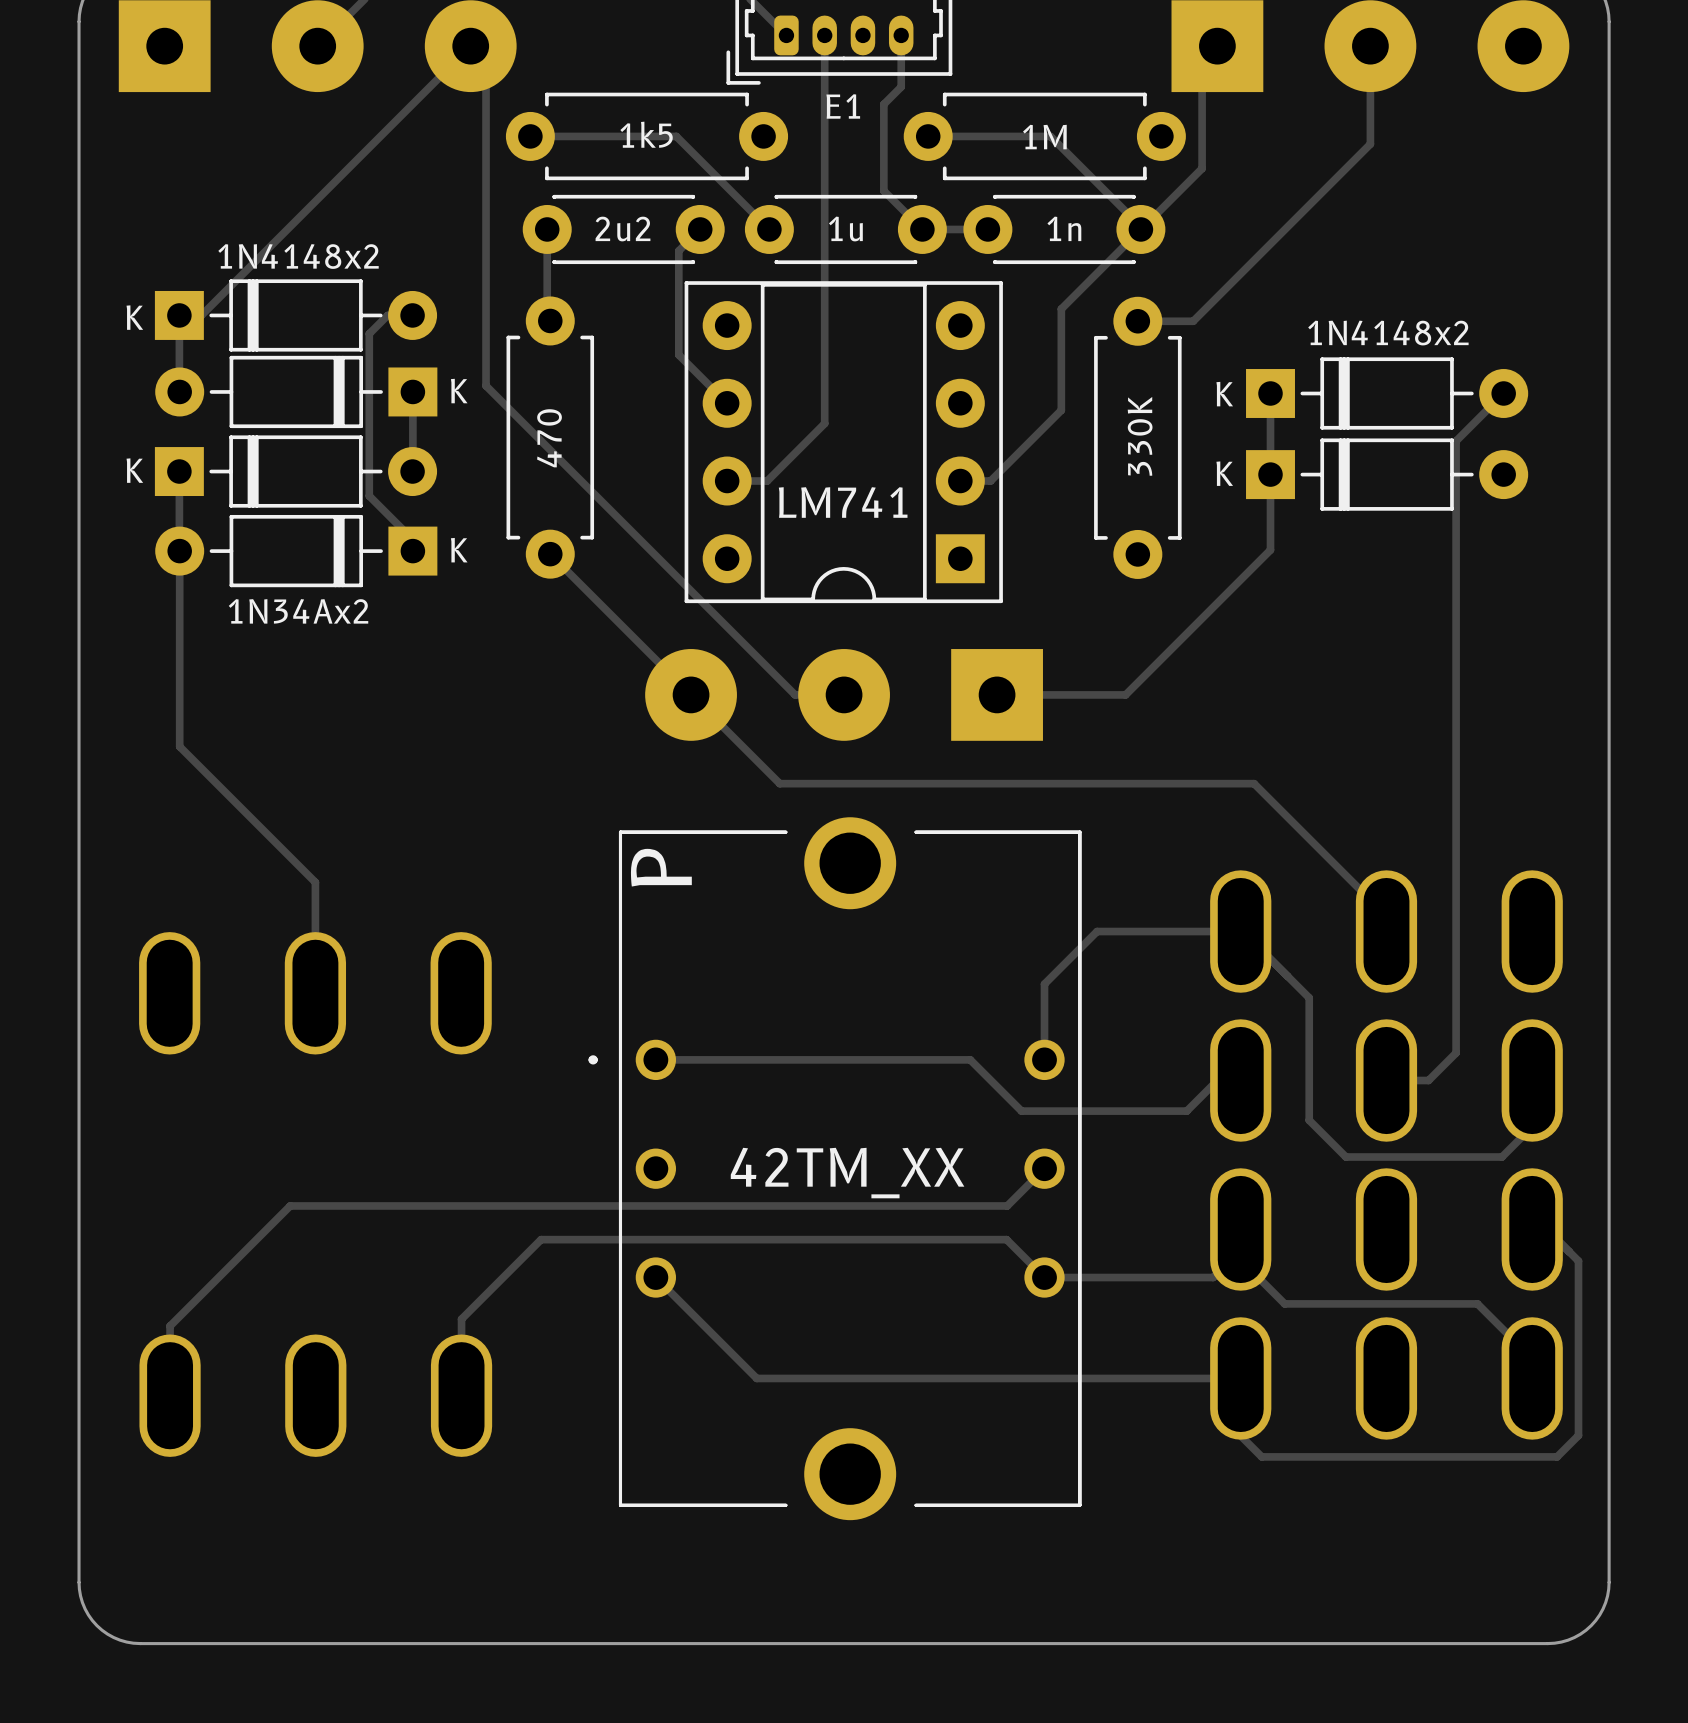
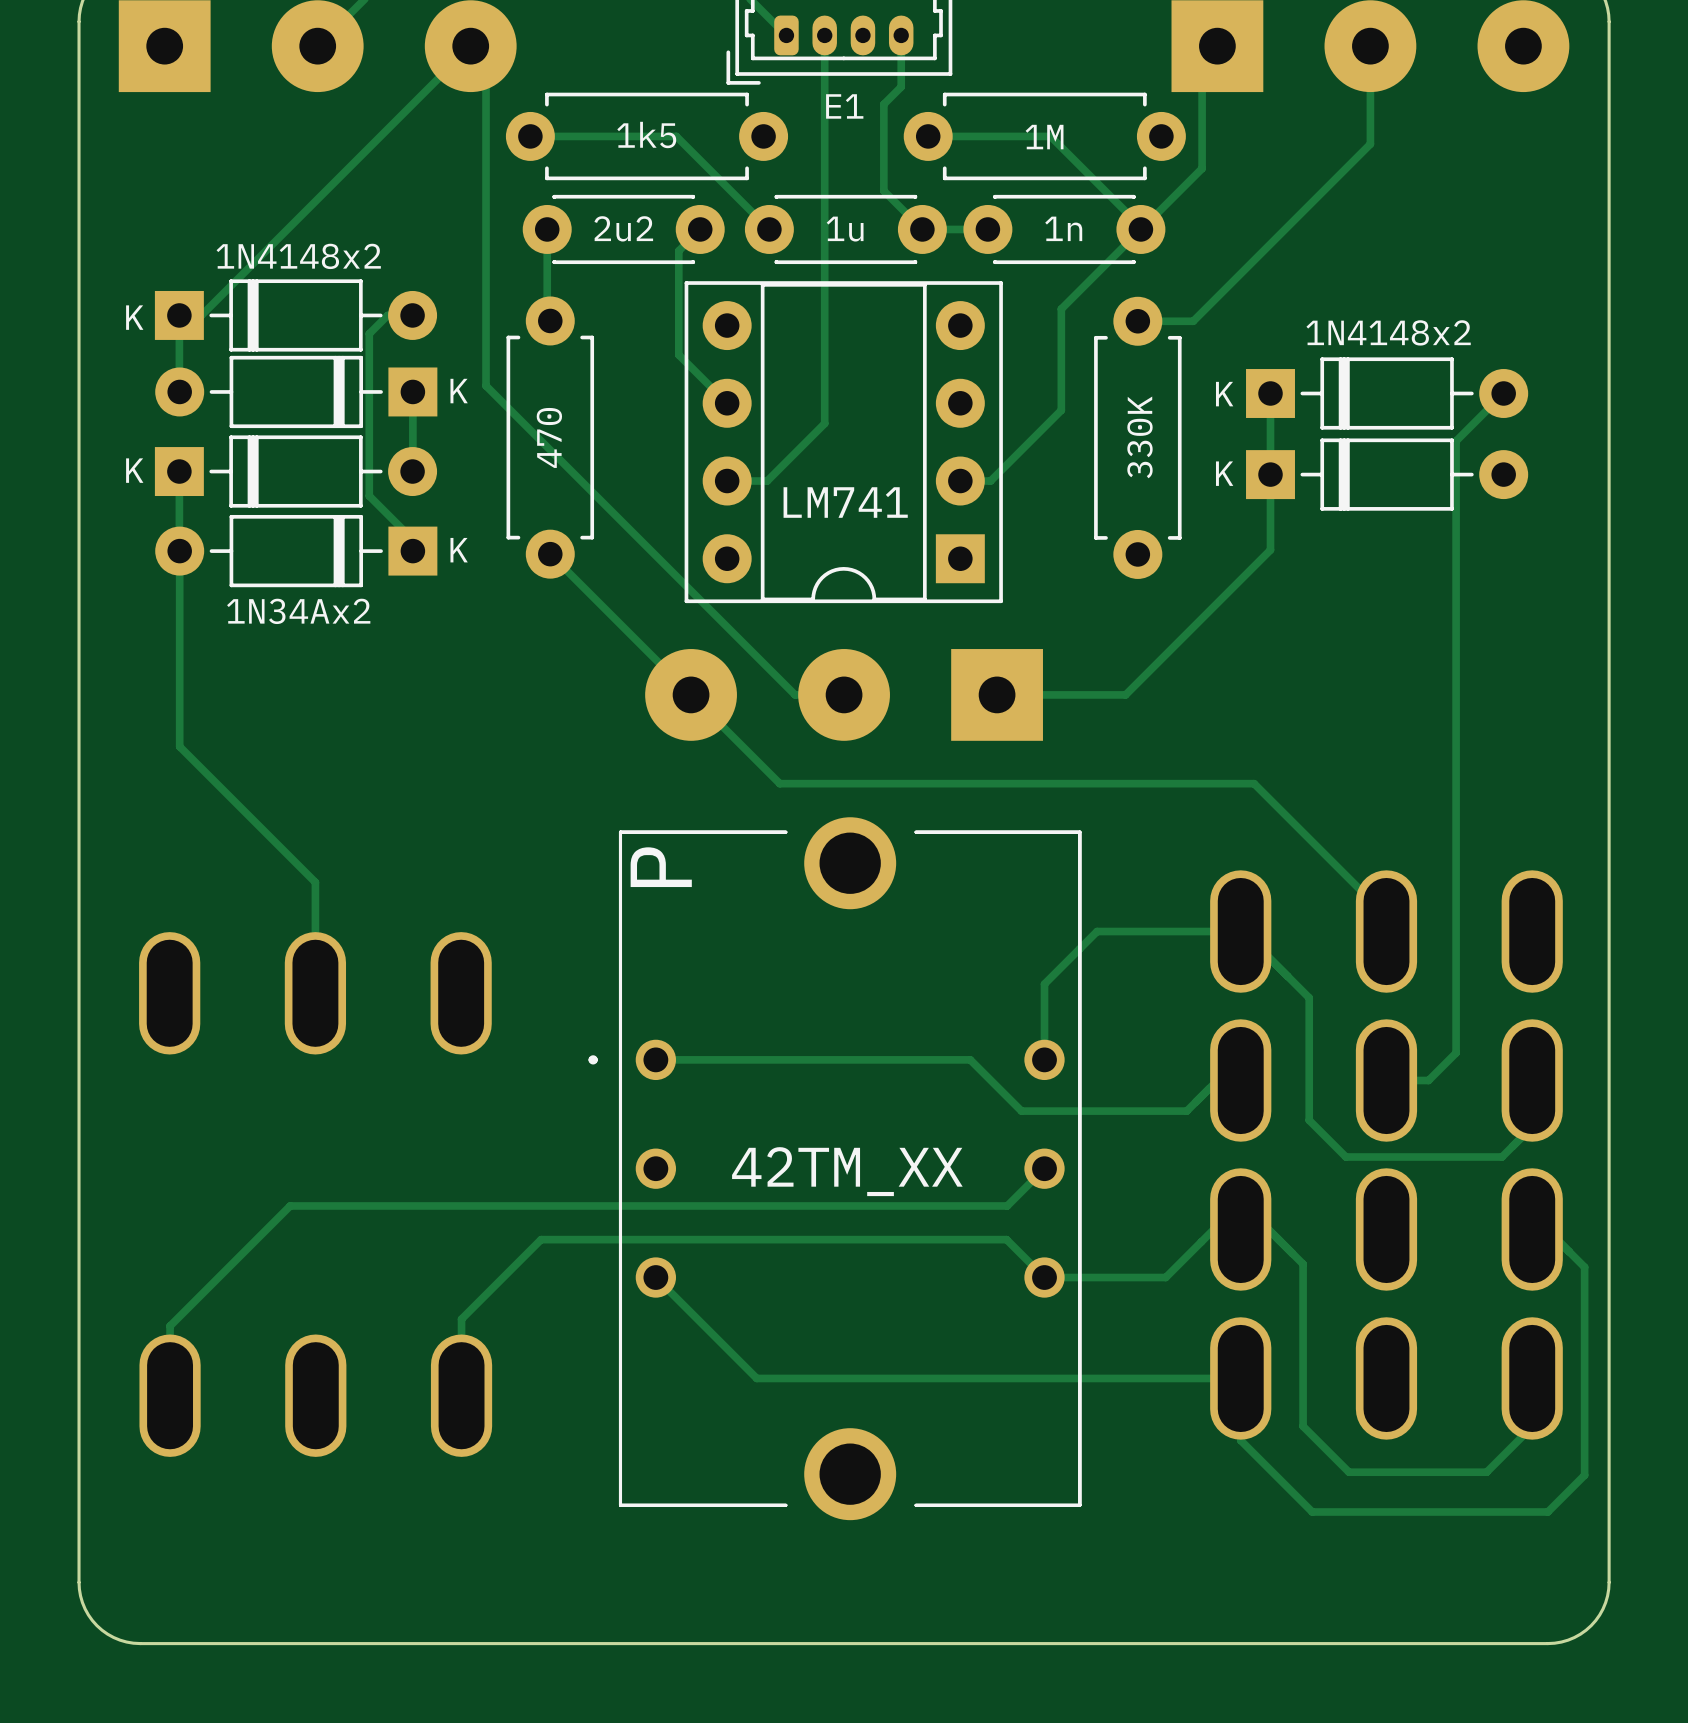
track: (1240, 1229) (1240, 1259) (1284, 1303) (1477, 1303) (1532, 1358) -> none
track: (1240, 1249) (1213, 1277) (1165, 1277) -> (1532, 1426) (1486, 1472) (1348, 1472) (1303, 1426) (1303, 1264) (1268, 1229) (1213, 1229) (1165, 1277)
track: (1578, 1261) (1578, 1435) (1557, 1456) (1261, 1456) (1240, 1435) -> (1578, 1261) (1584, 1267) (1584, 1475) (1547, 1511) (1312, 1511) (1240, 1440) (1240, 1435)

